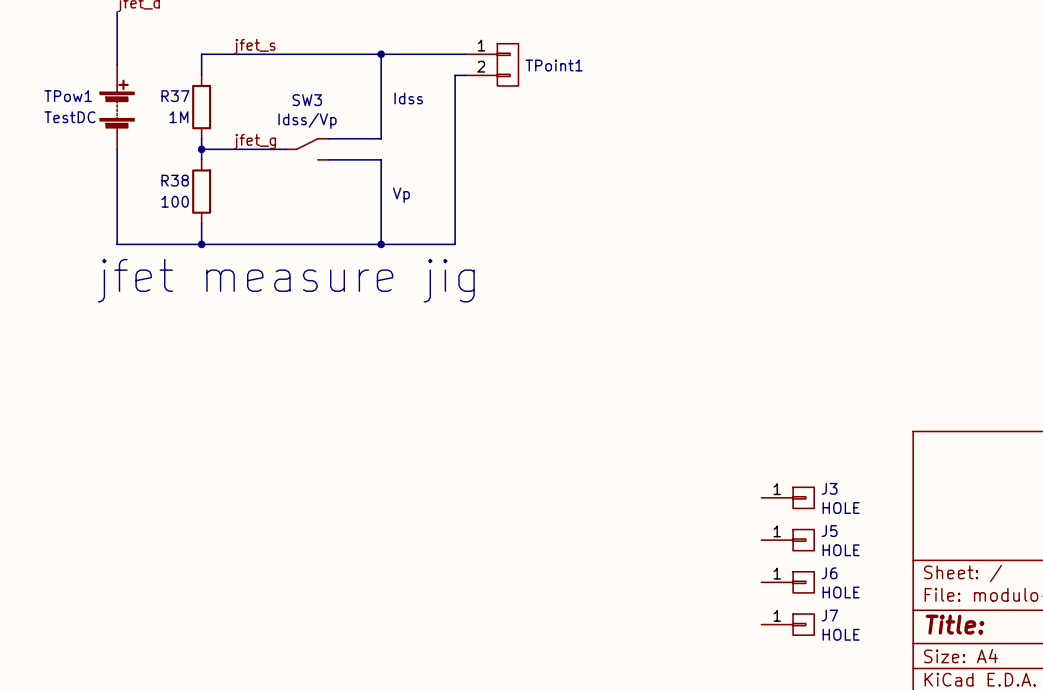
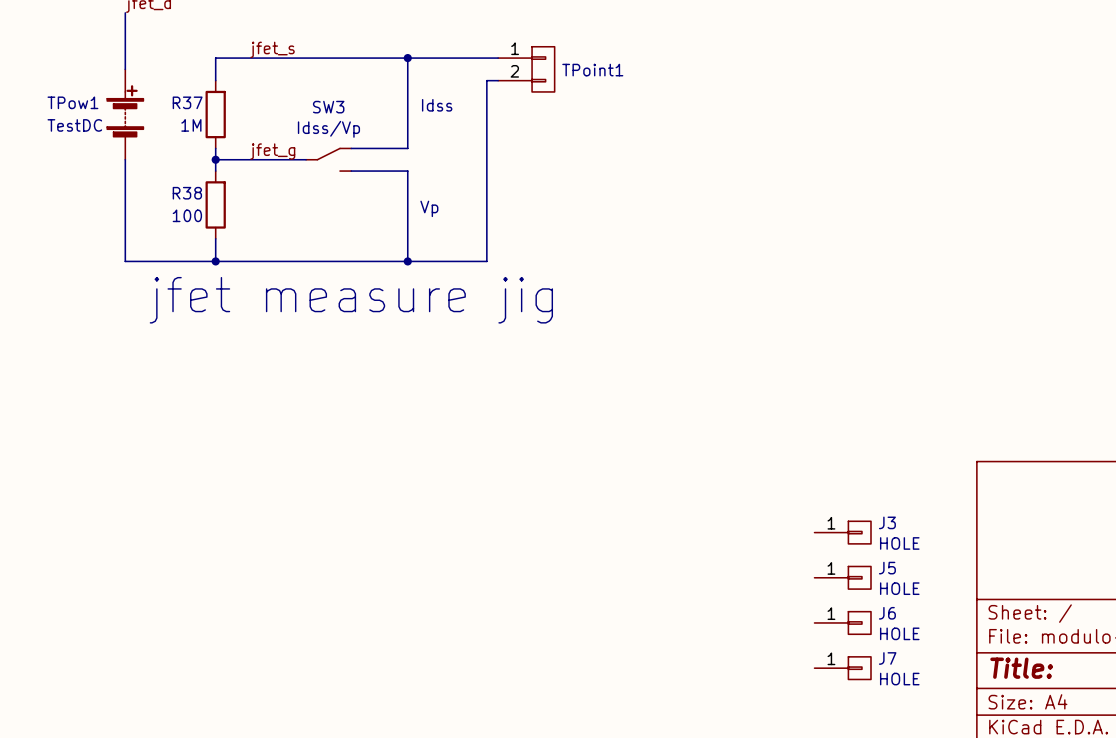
text position: jfet measure jig (286, 280) -> jfet measure jig (351, 300)

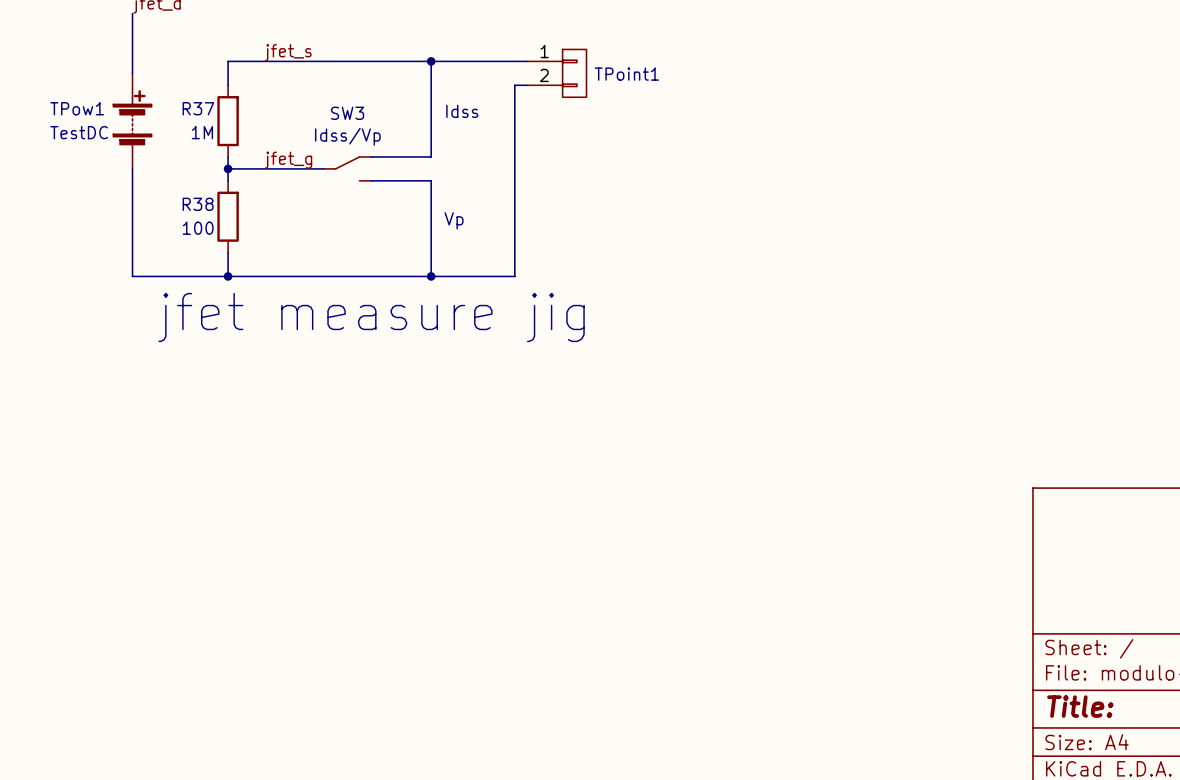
J3: HOLE (842, 532) -> none
J5: HOLE (842, 577) -> none
J6: HOLE (842, 622) -> none
J7: HOLE (842, 668) -> none

